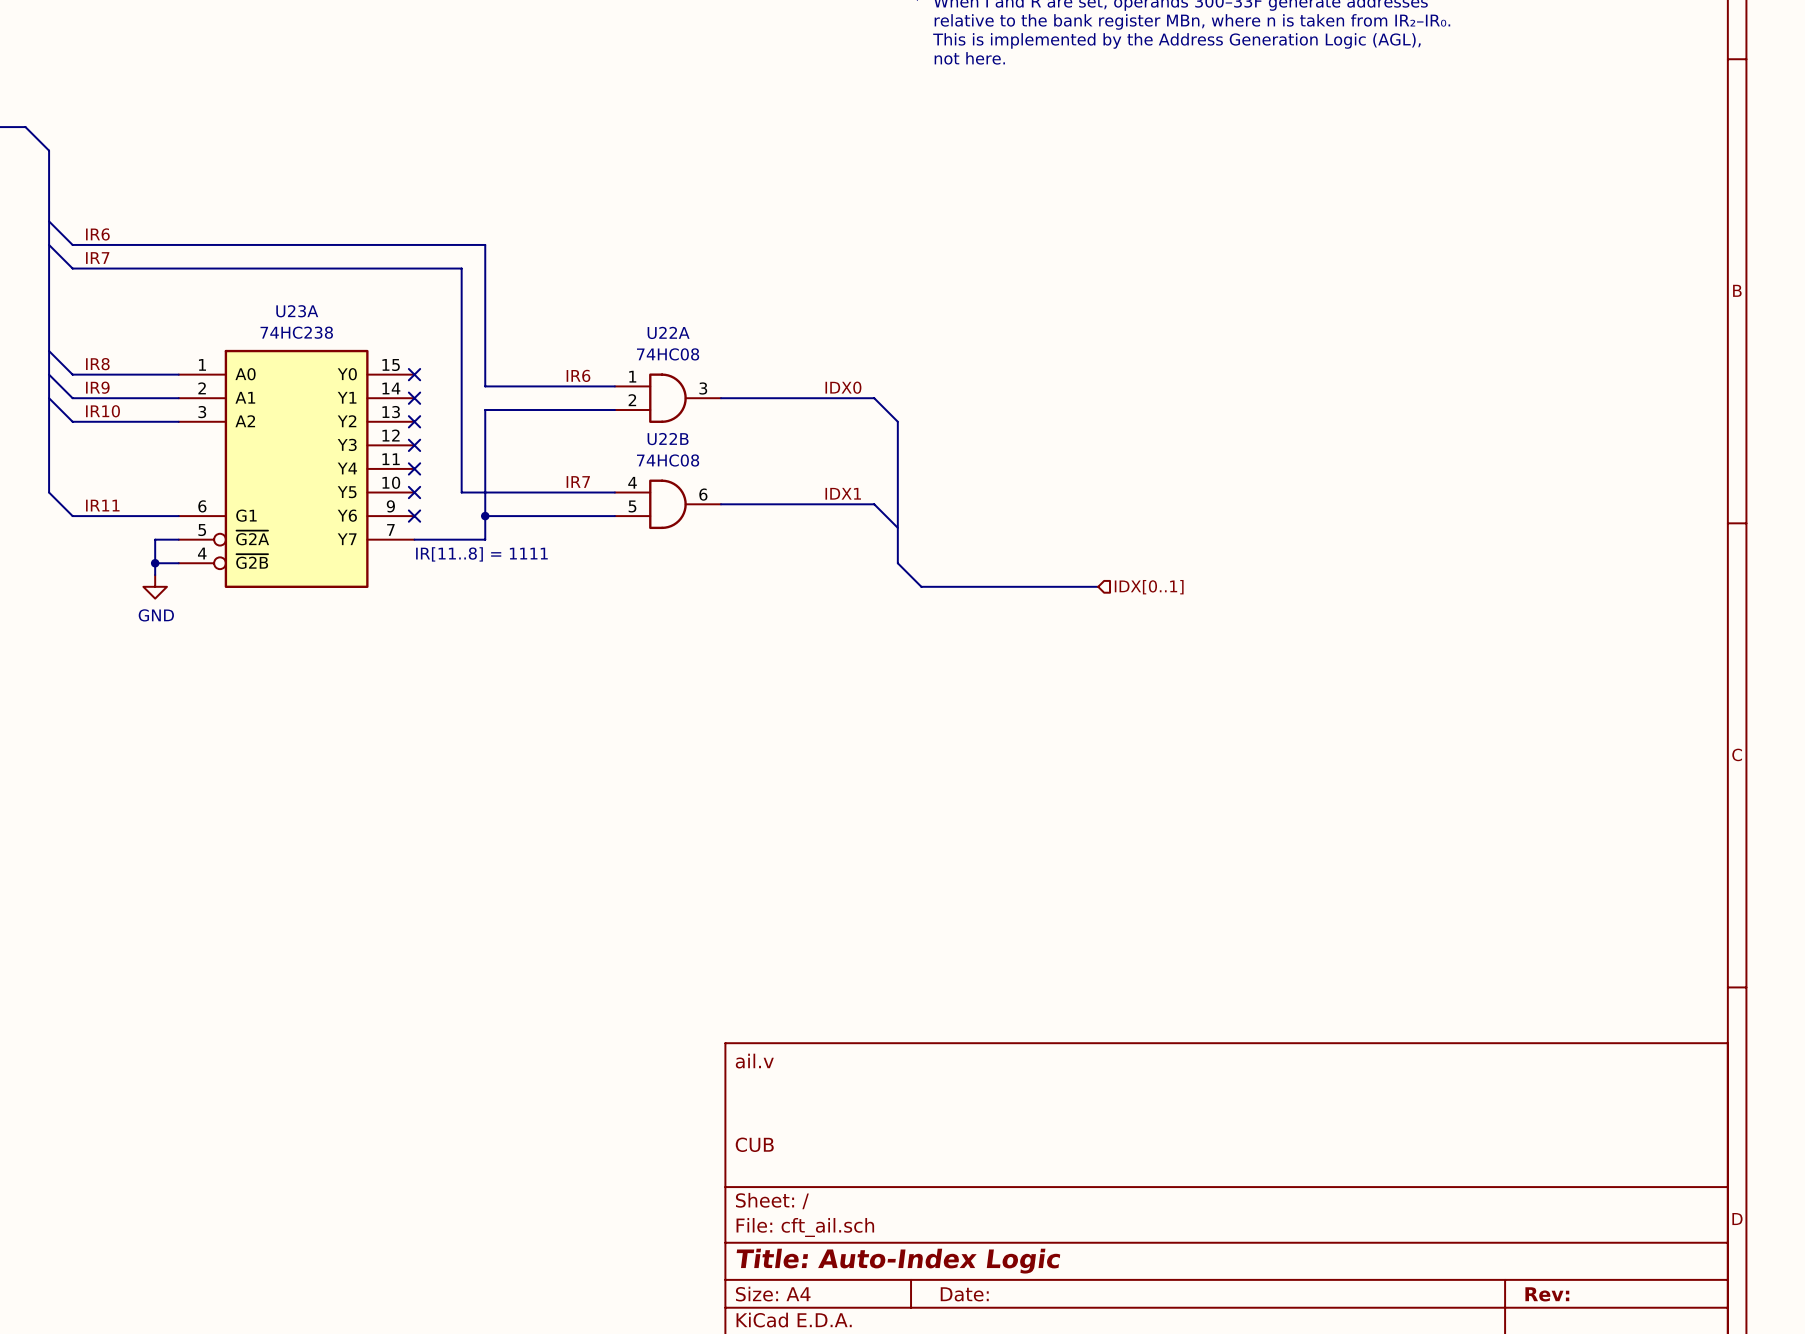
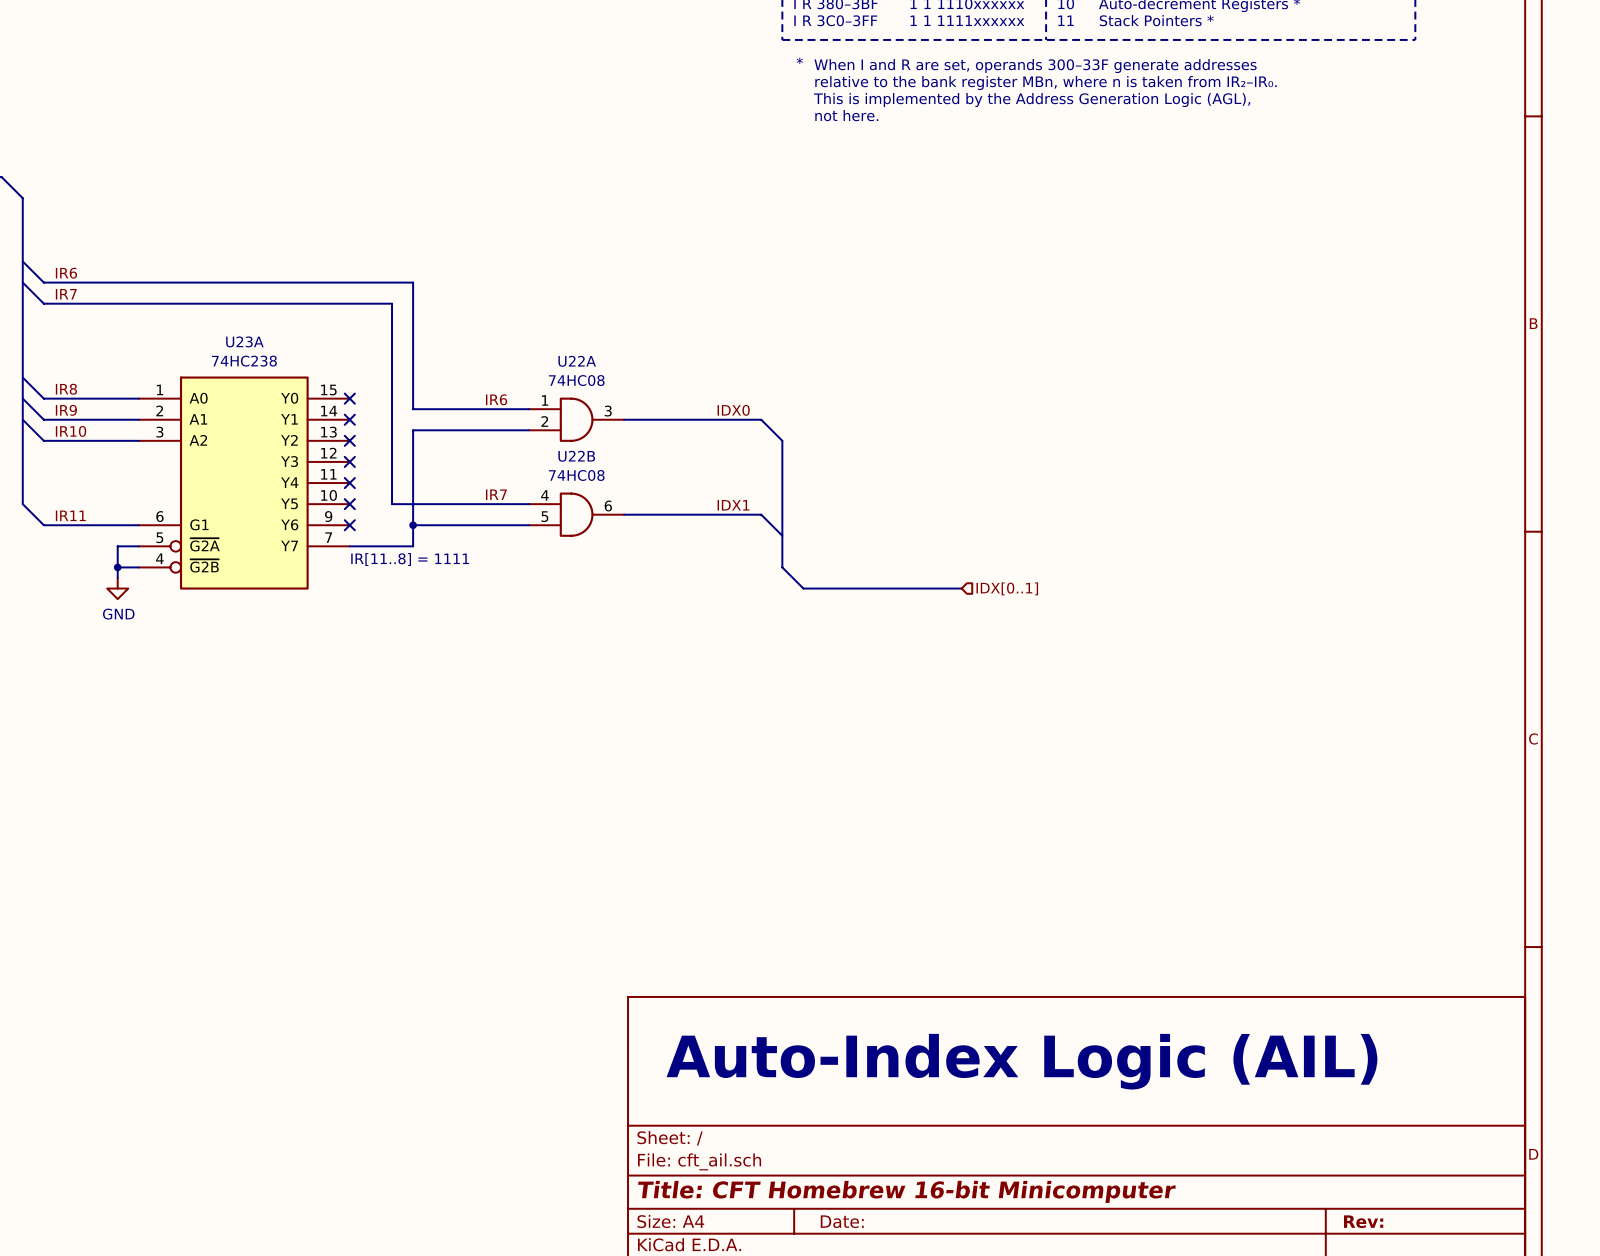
title block: ail.v (754, 1061) -> none
text: none -> Auto-Index Logic (AIL) (1021, 1061)
title block: CUB (754, 1144) -> none
title block: Title: Auto-Index Logic (898, 1261) -> Title: CFT Homebrew 16-bit Minicomputer (906, 1191)

